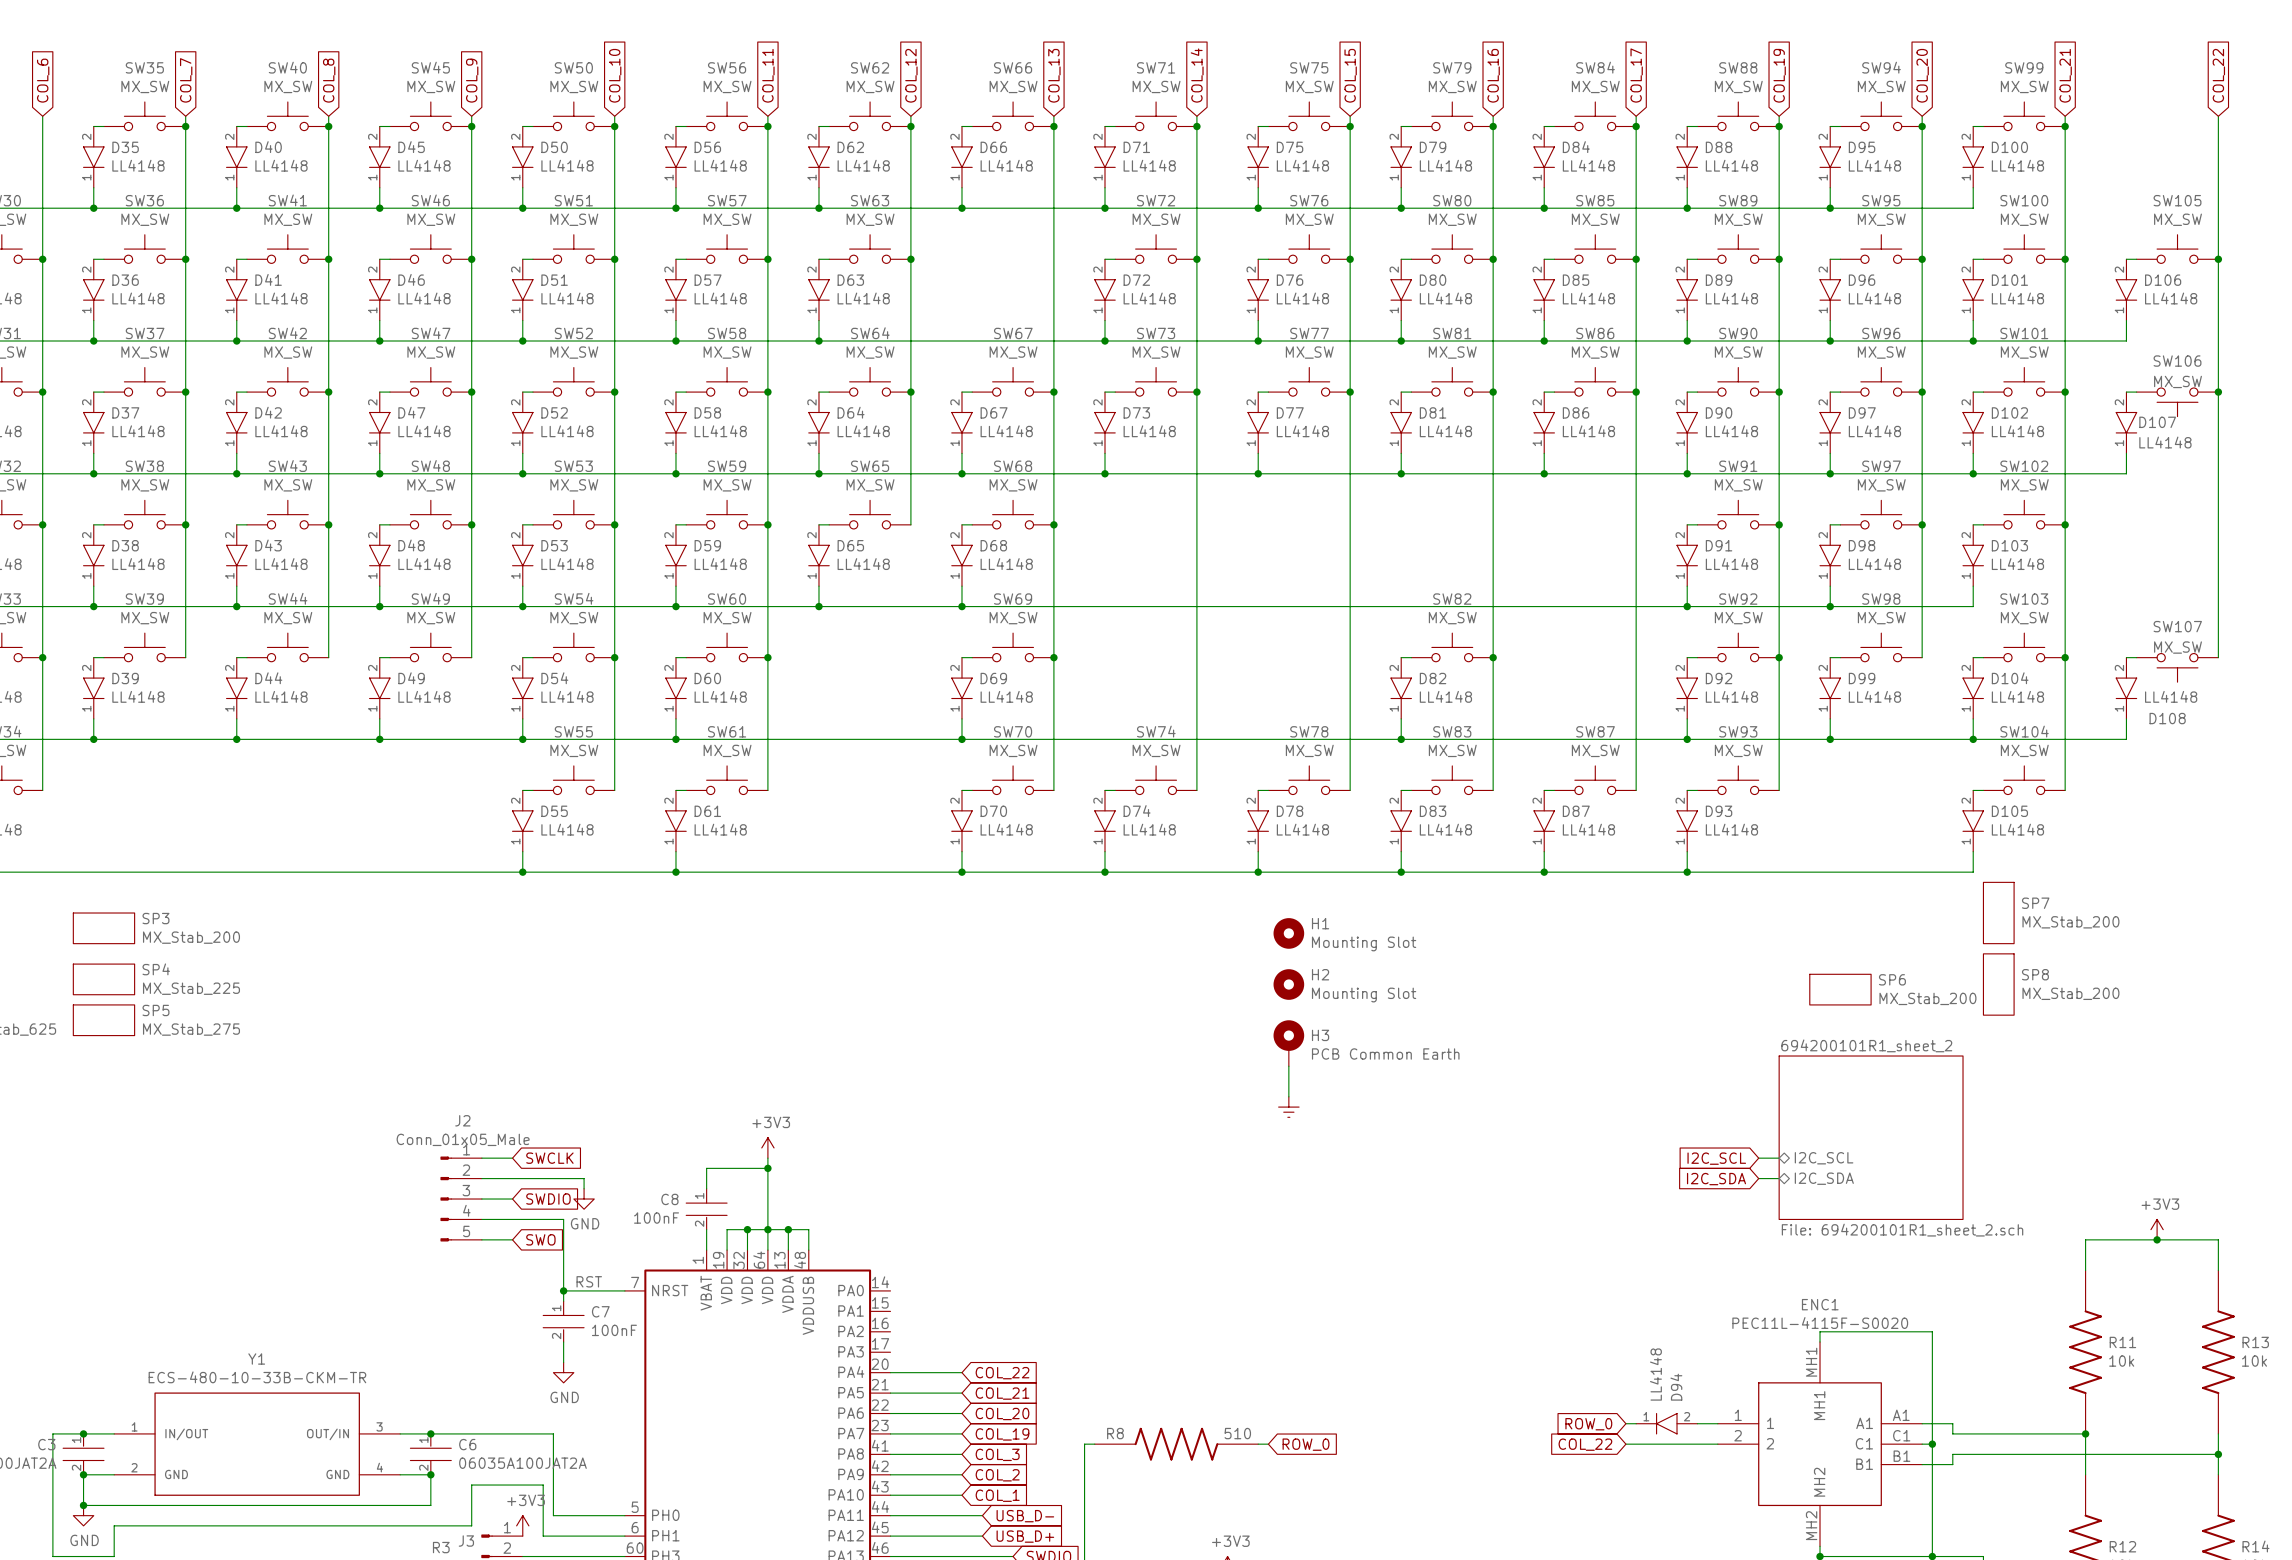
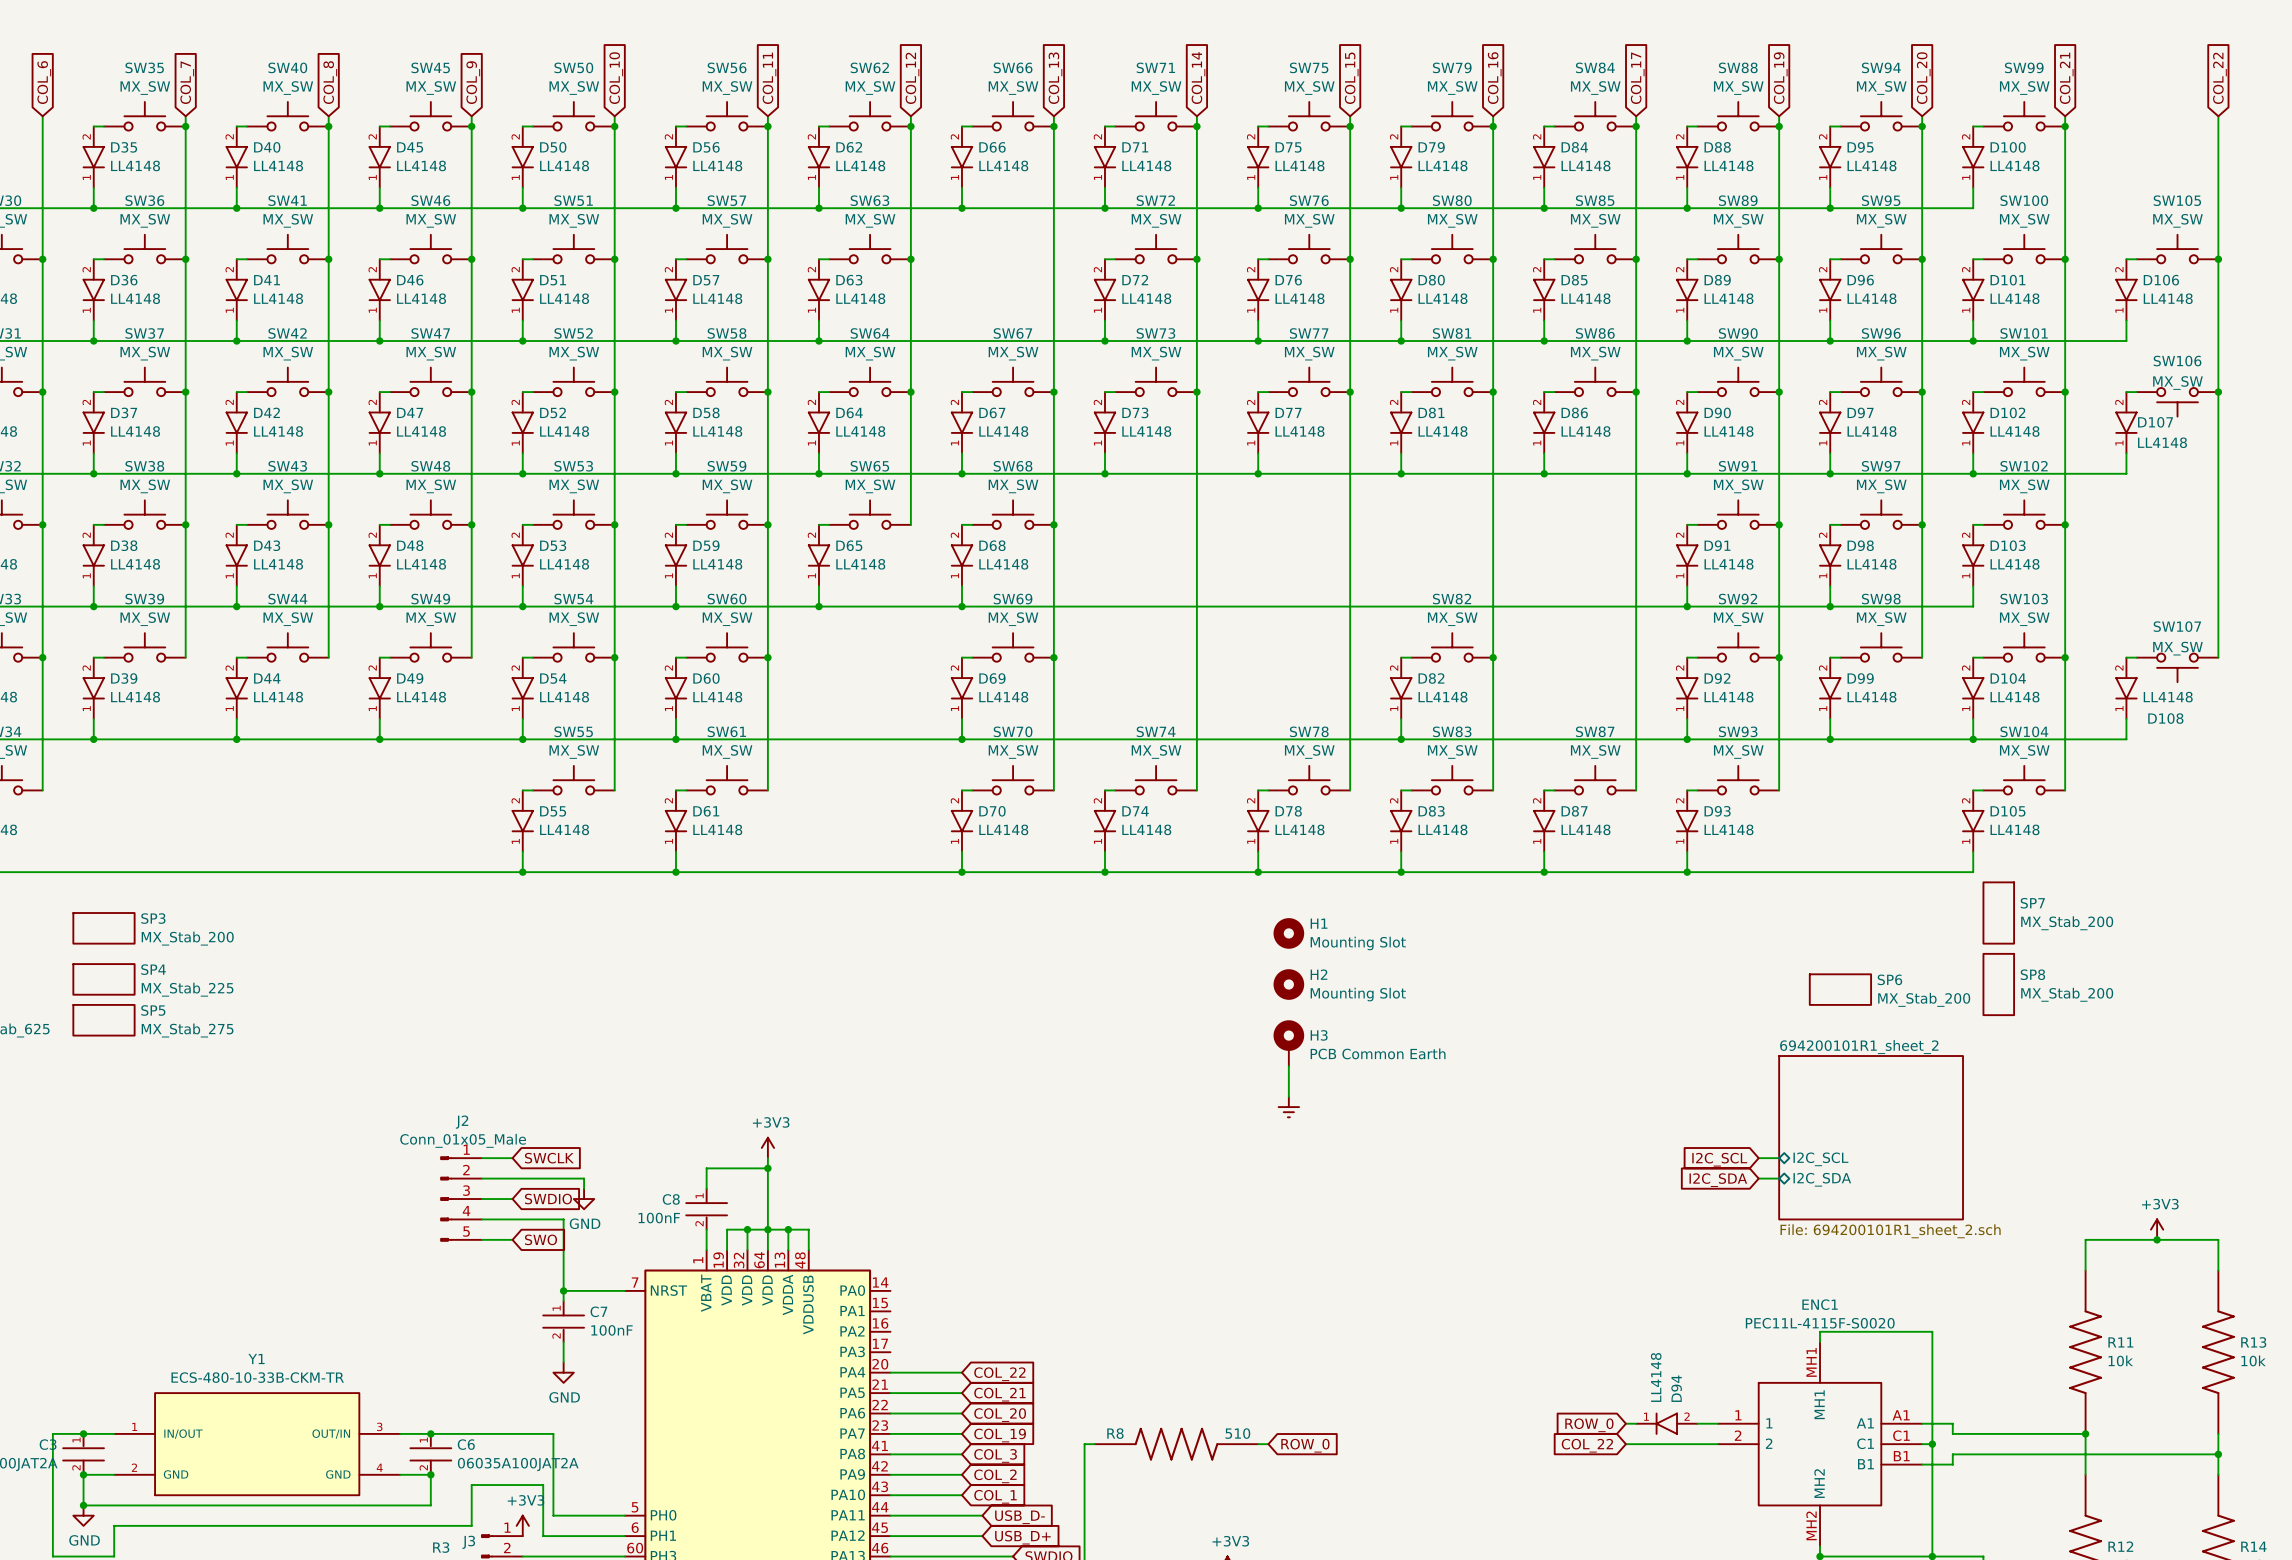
label: RST (589, 1281) -> none

